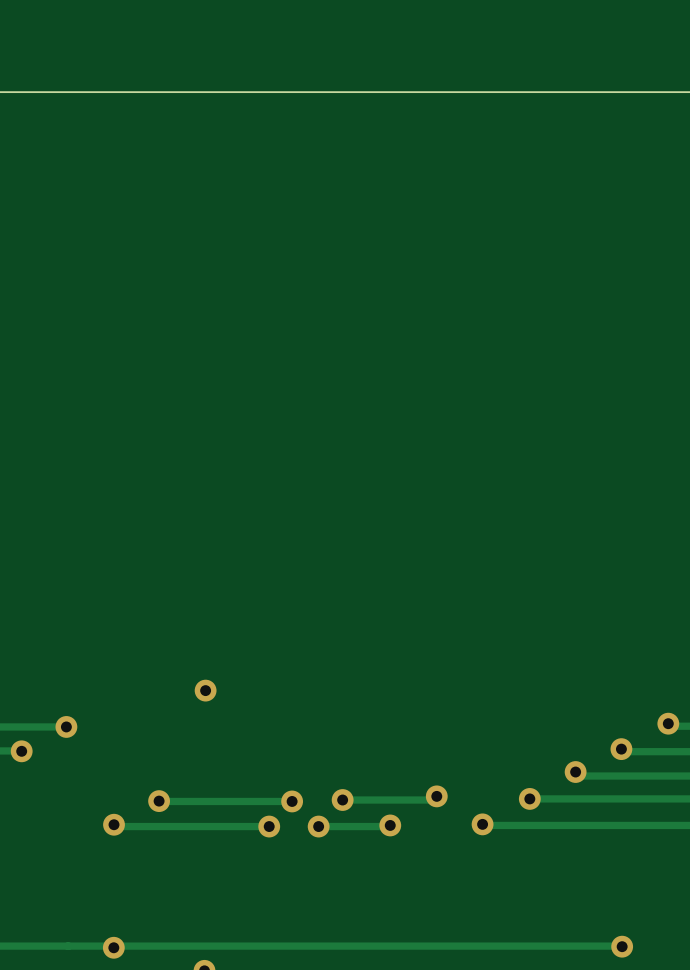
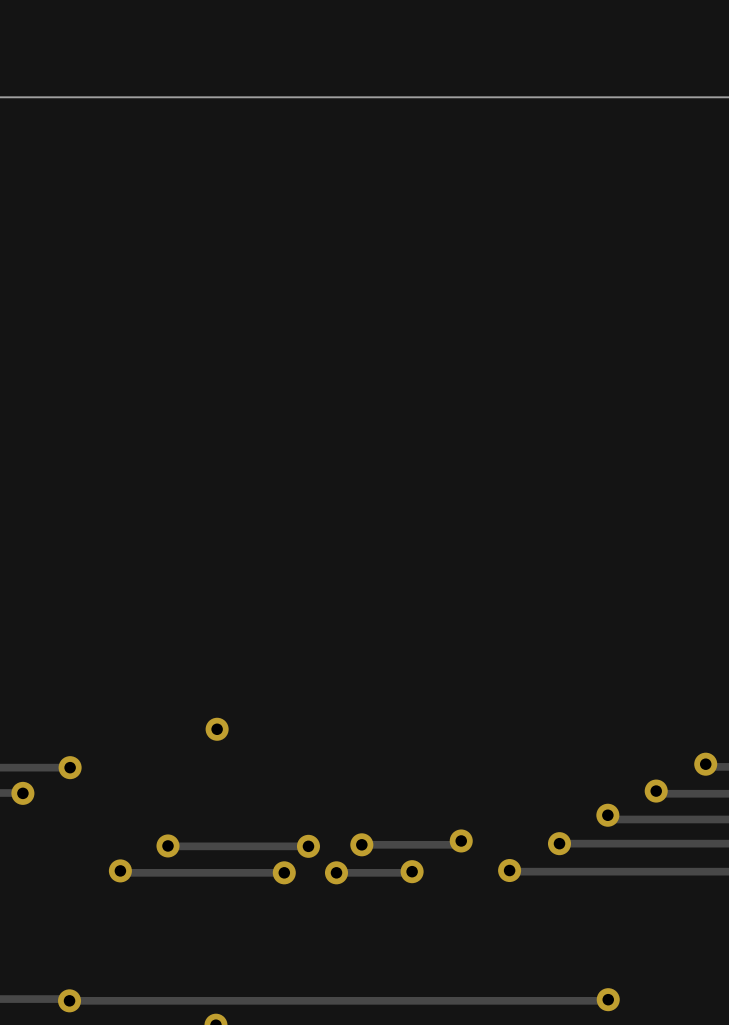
track: (64, 946) (622, 946) -> (67, 999) (69, 1000) (608, 999)
via position: (622, 946) -> (608, 999)
via position: (113, 947) -> (69, 1000)

